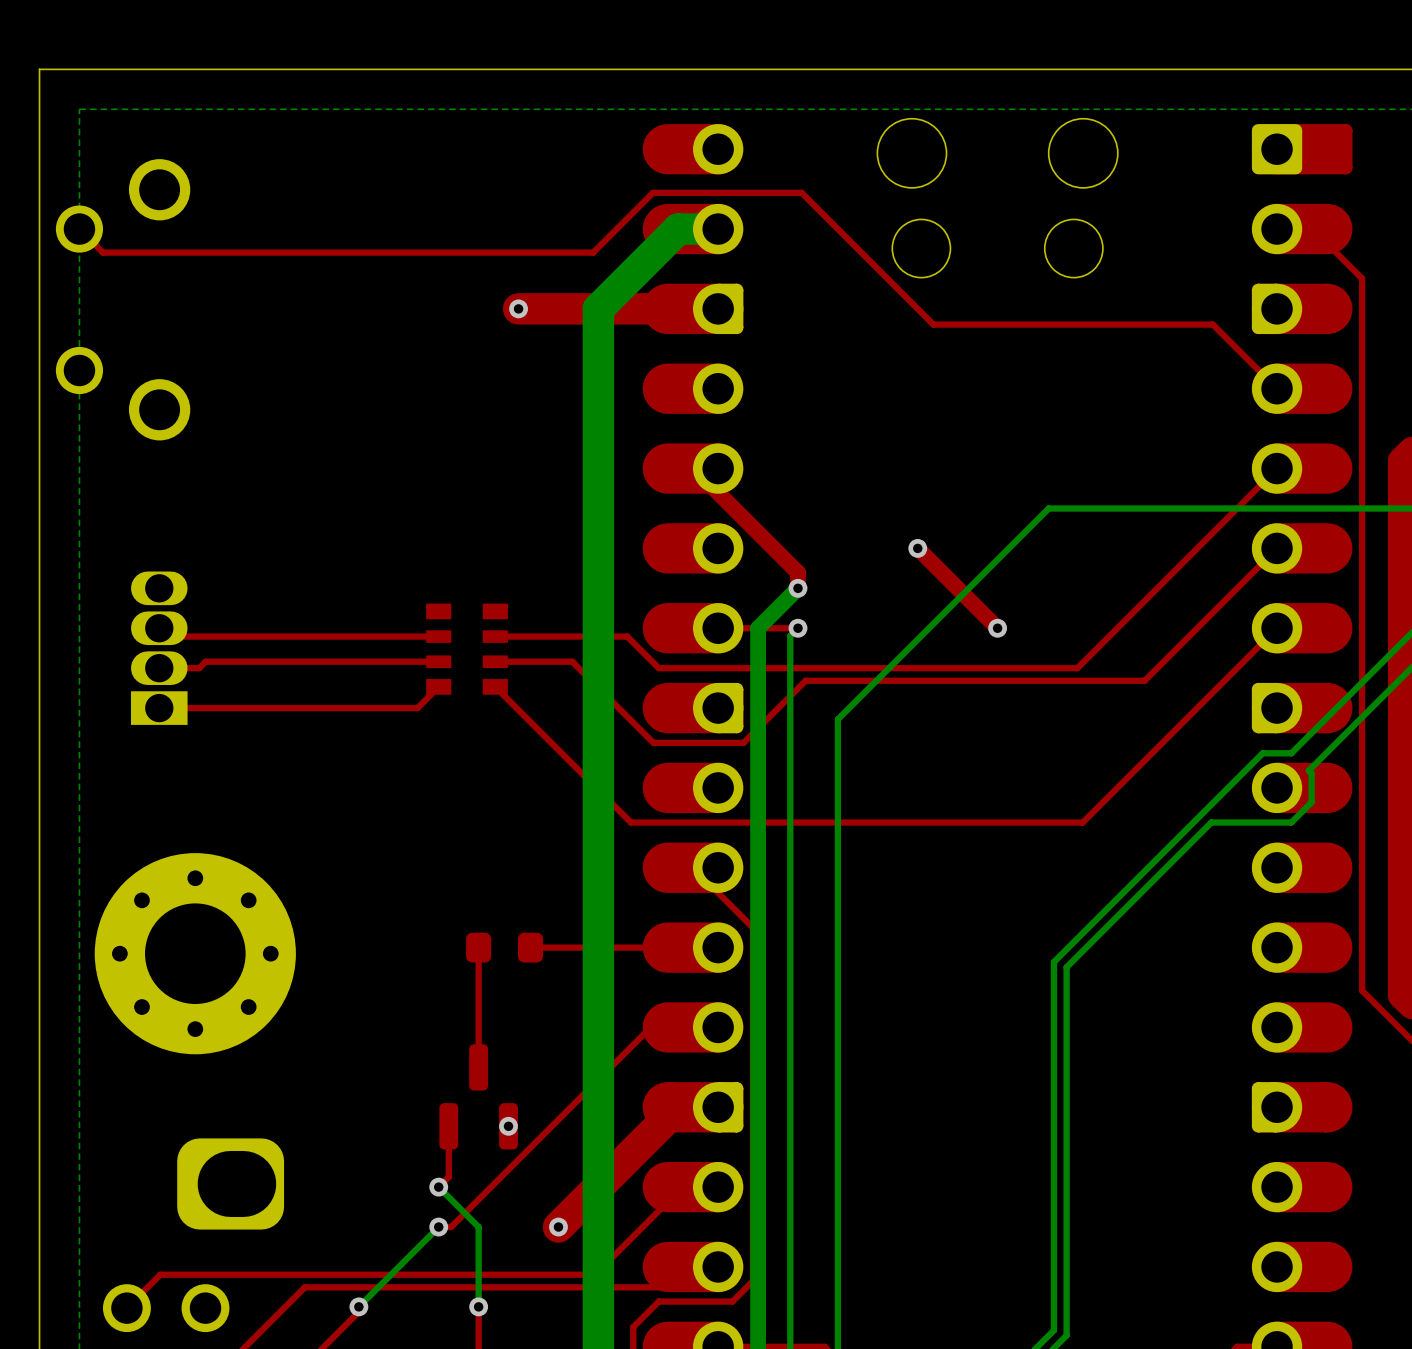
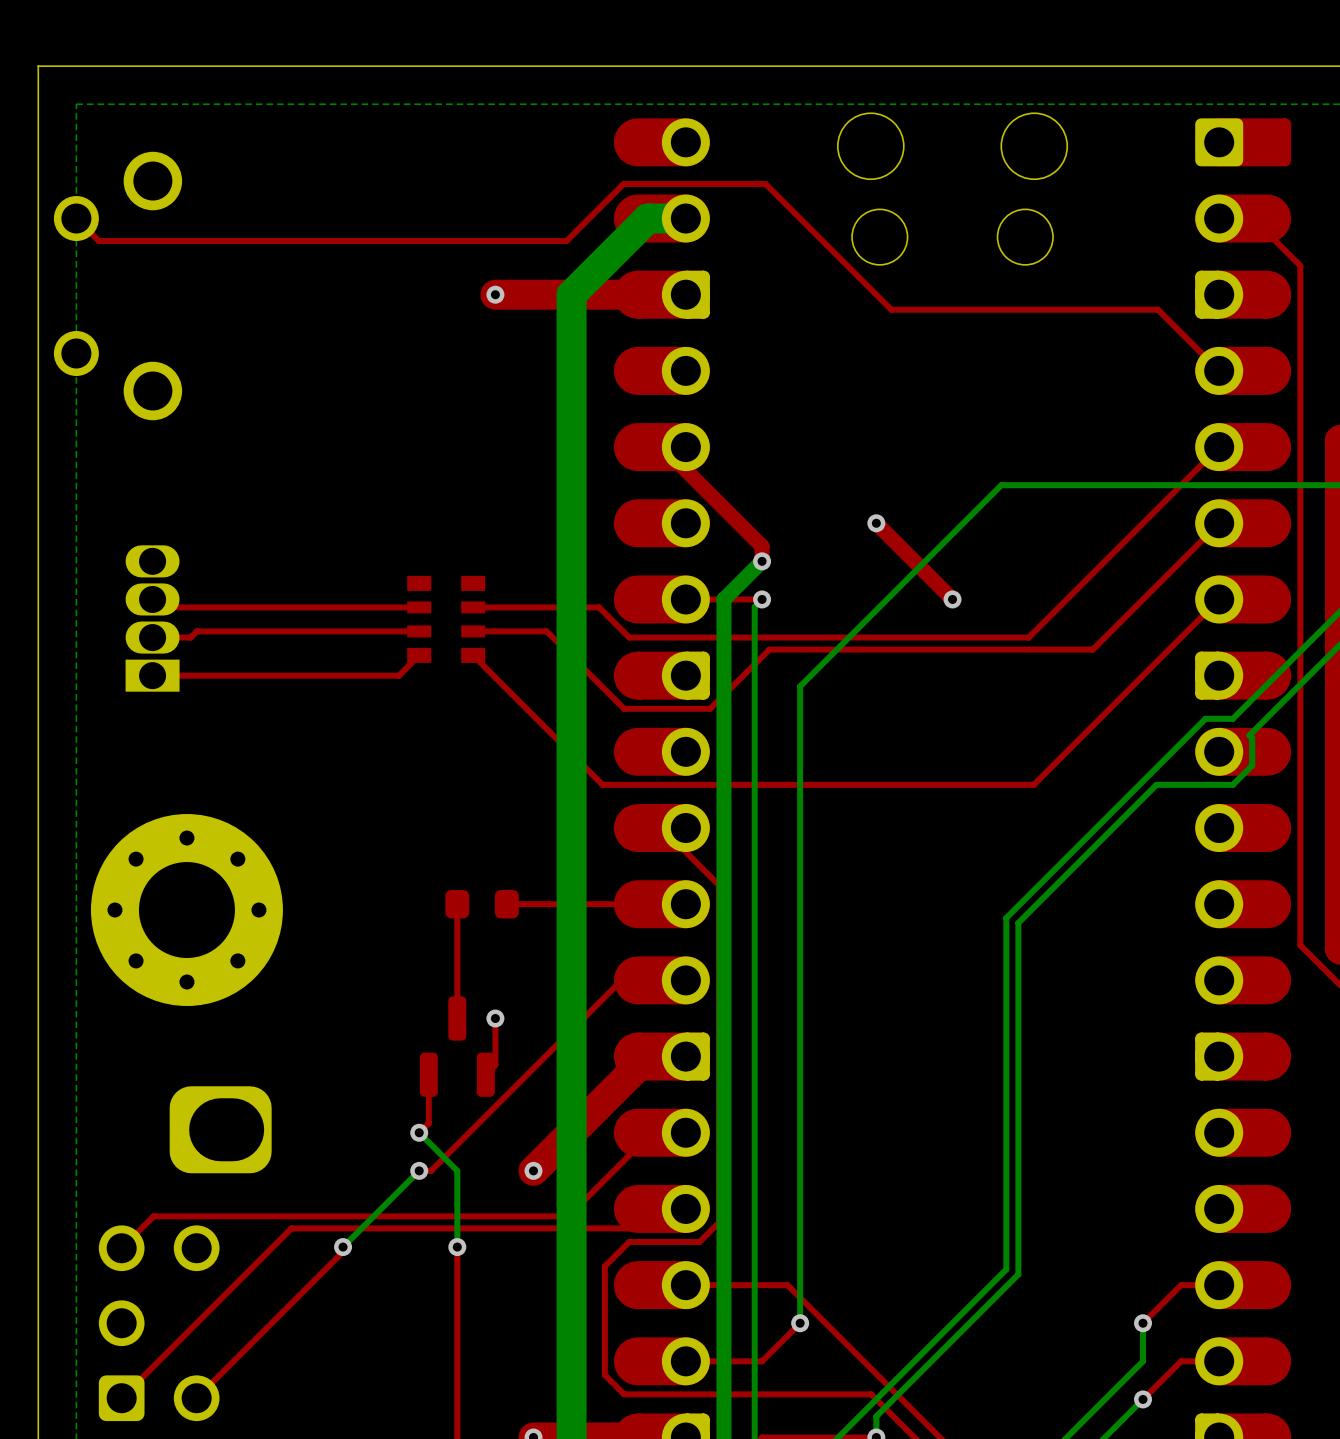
top track: none -> (495, 1018) (495, 1065) (485, 1074)
via position: (508, 1126) -> (495, 1018)

